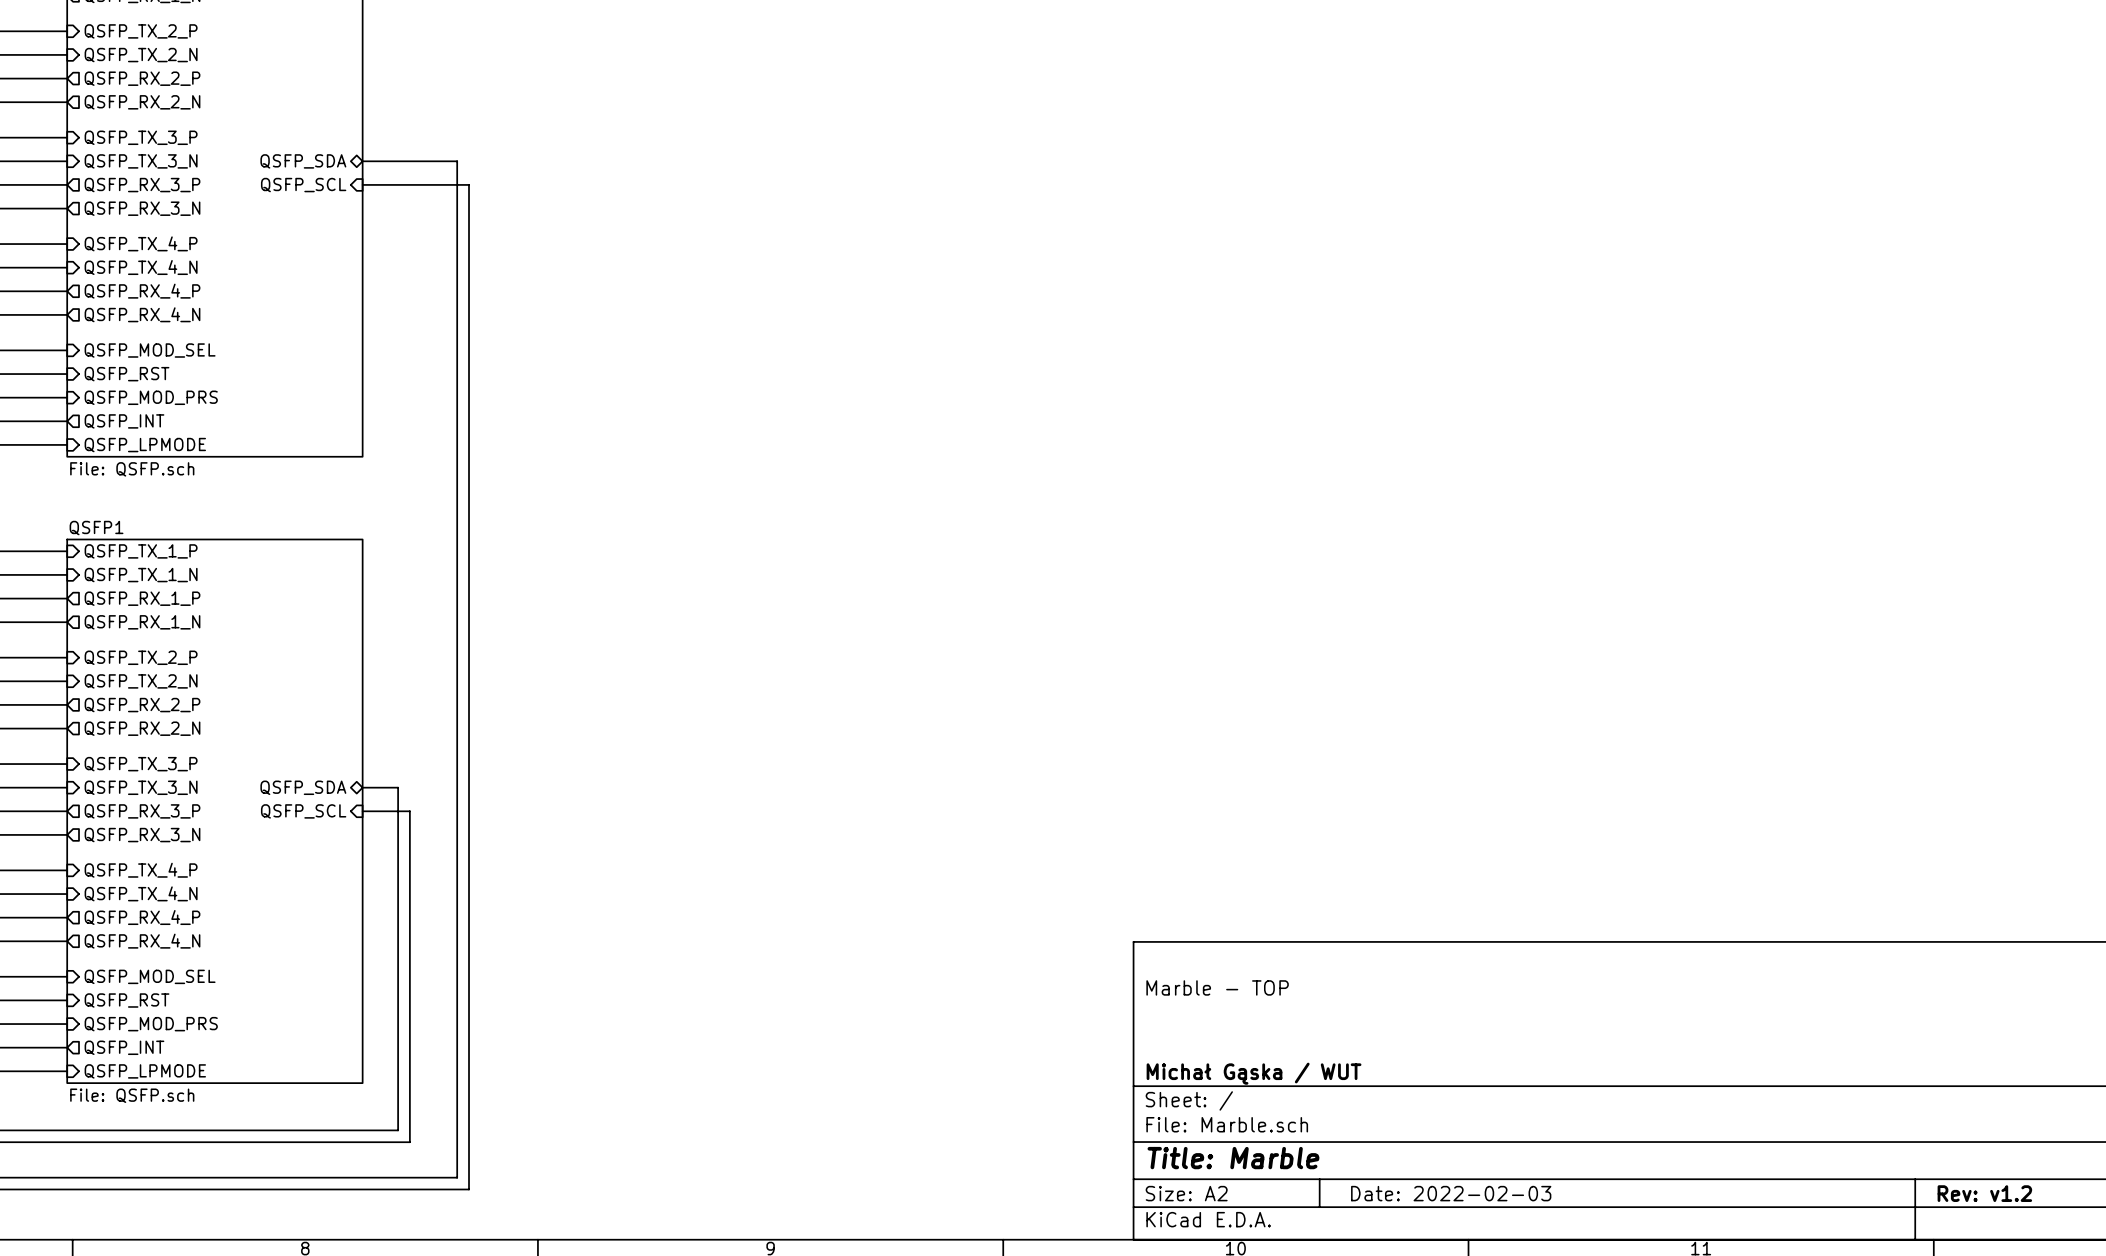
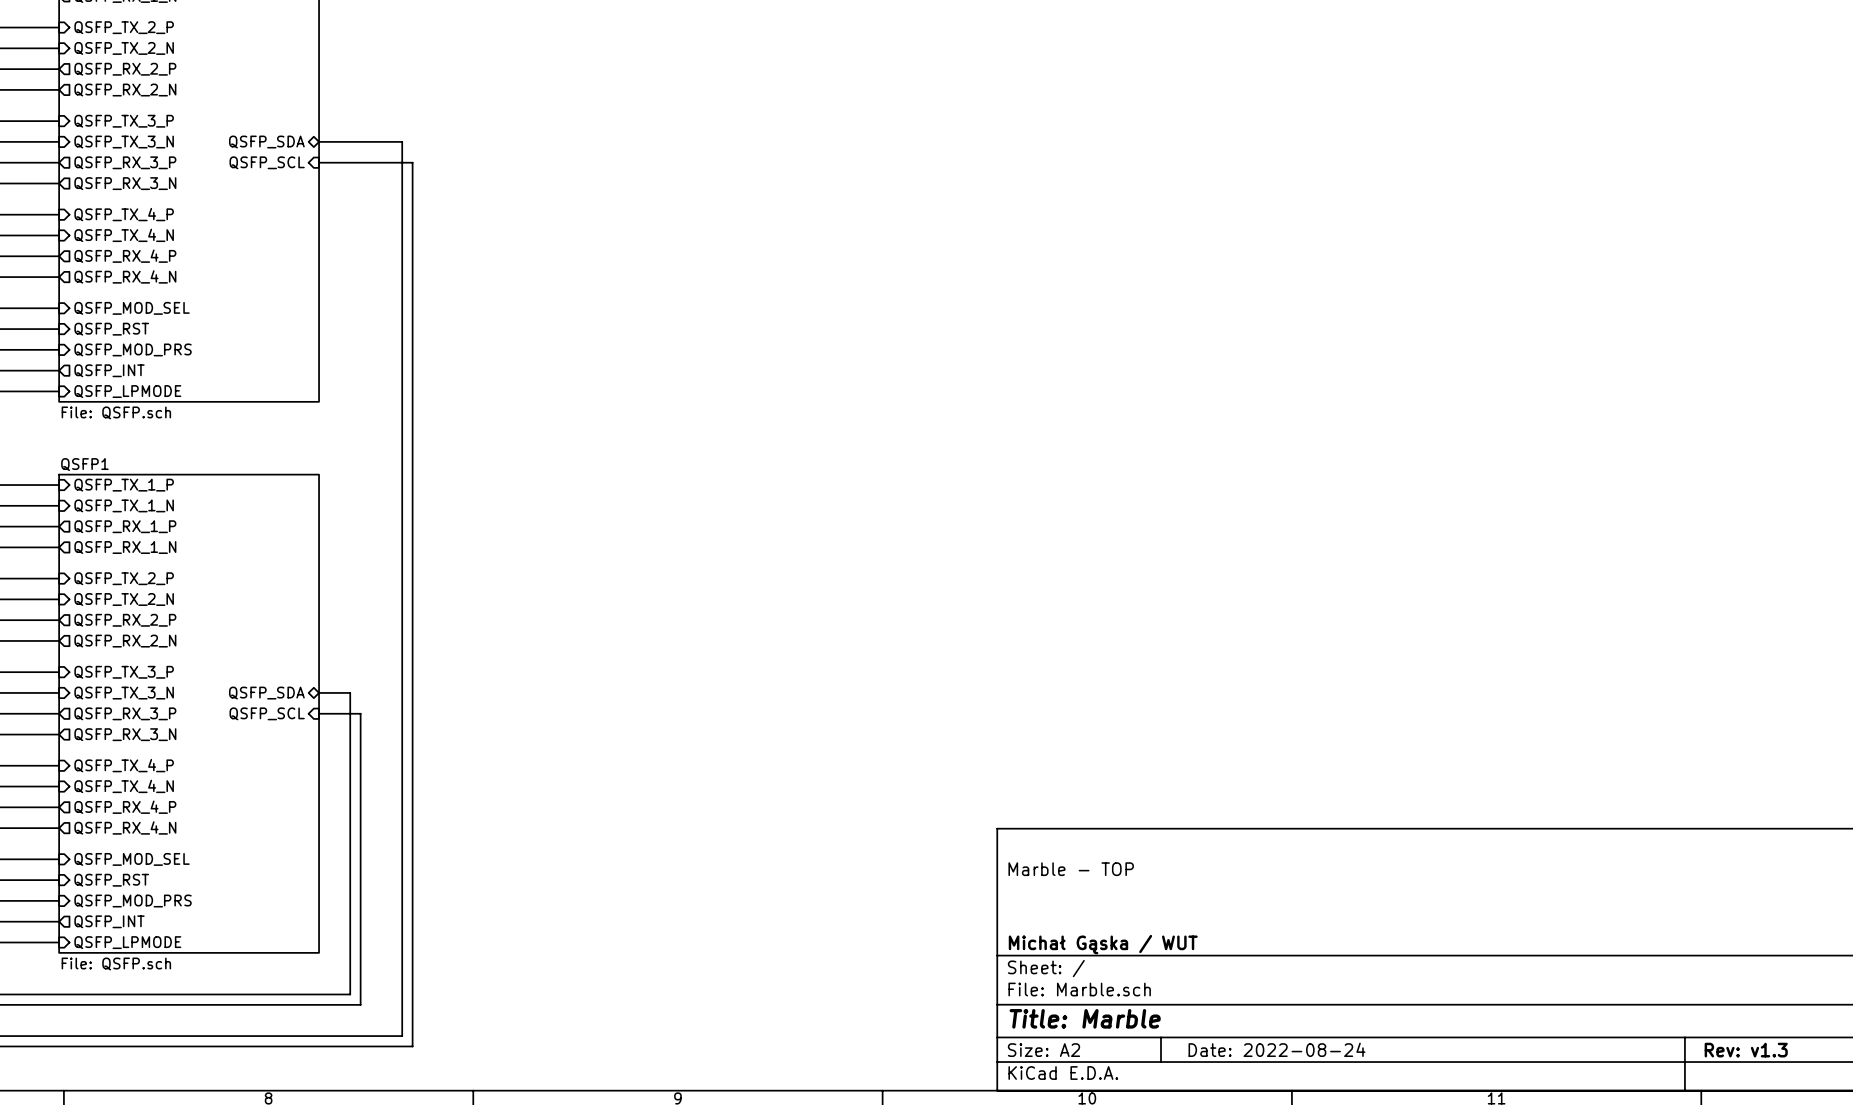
title block: Date: 2022-02-03 (1451, 1193) -> Date: 2022-08-24 (1277, 1049)
title block: Rev: v1.2 (1984, 1193) -> Rev: v1.3 (1746, 1050)

